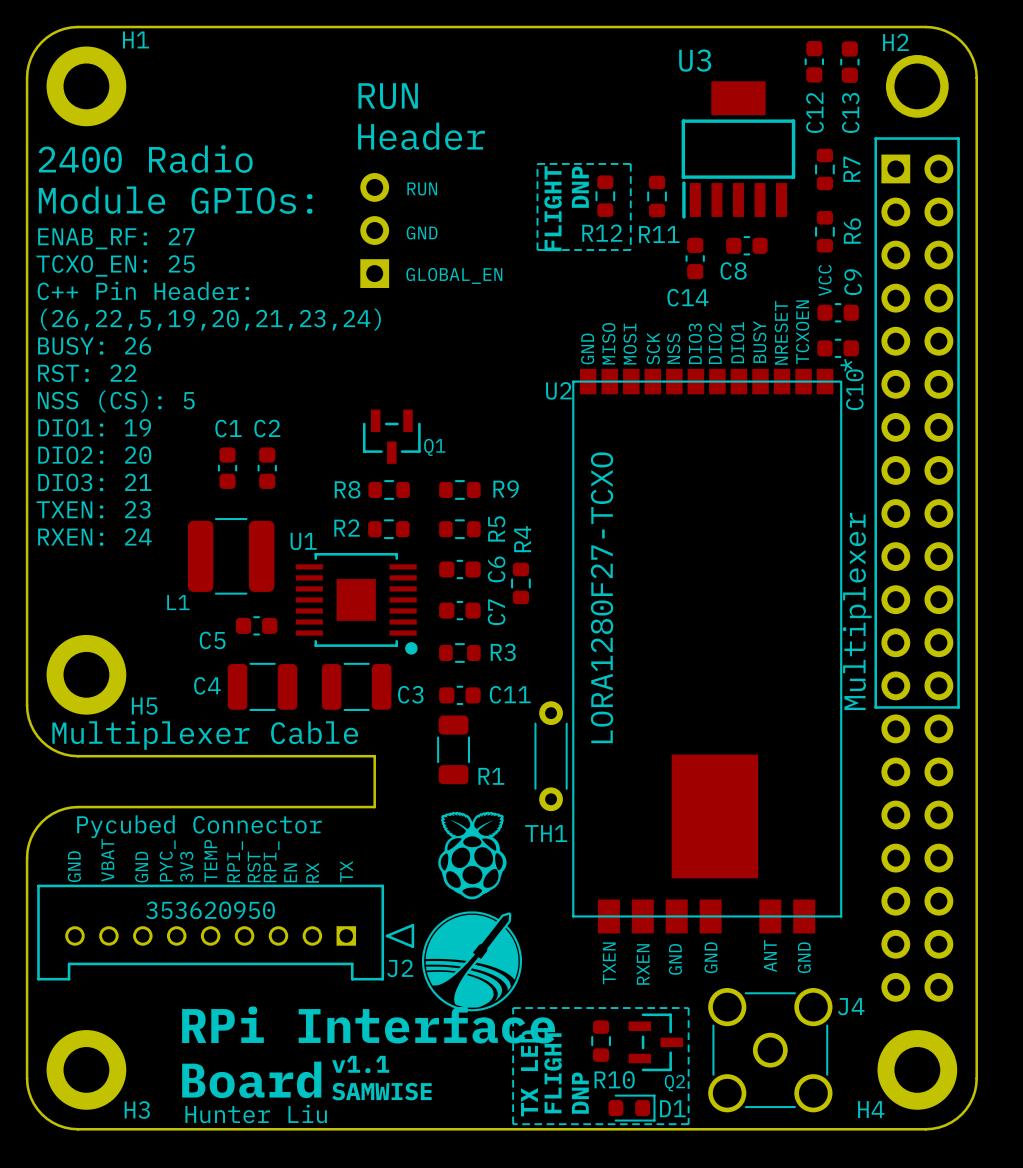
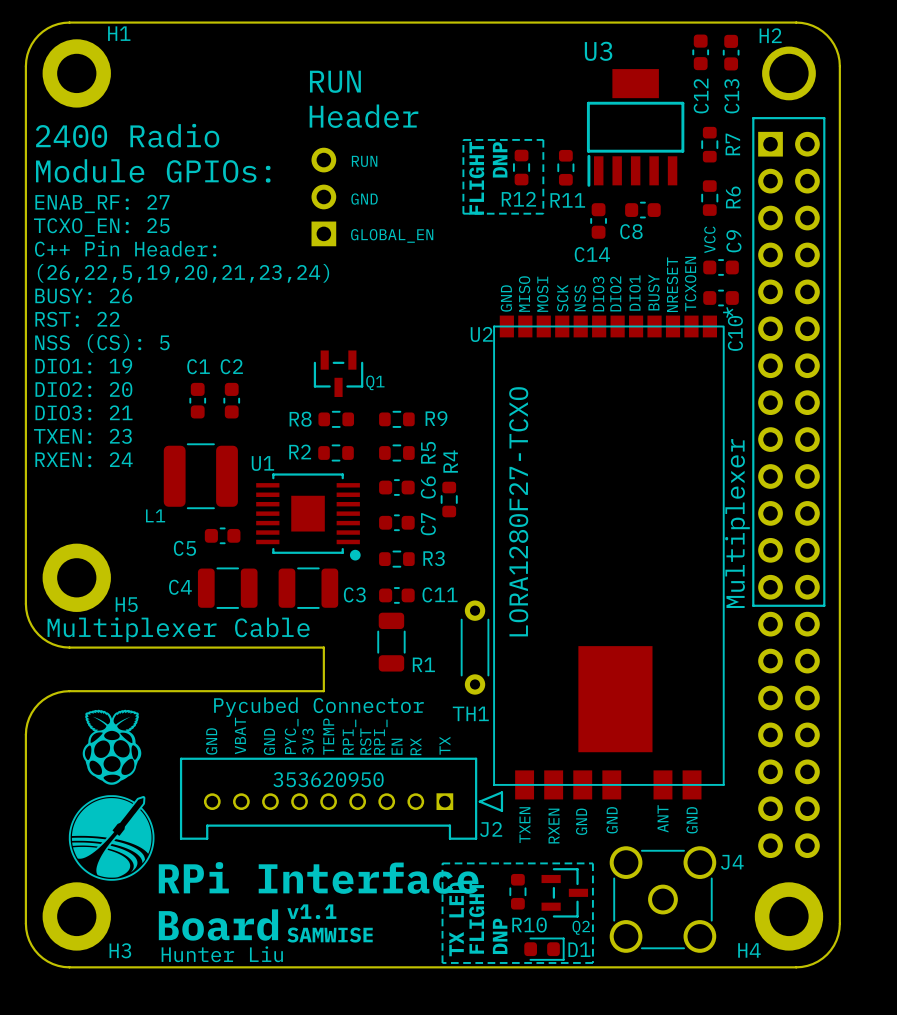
text position: Pycubed Connector (199, 826) -> Pycubed Connector (318, 707)
drawing position: (472, 855) -> (111, 747)
text position: VBAT (107, 860) -> VBAT (240, 735)
text position: PYC_ (167, 860) -> PYC_ (291, 736)
text: none -> RPI_ (349, 737)
text: none -> RPI_ (380, 737)
text position: TEMP (210, 861) -> TEMP (328, 736)
text: RPI_ (235, 861) -> GND (211, 741)
text: RPI_ (271, 861) -> none
text: GND (74, 866) -> none
text position: 3V3 (186, 866) -> 3V3 (307, 741)
text position: RST (254, 866) -> RST (365, 741)
text: none -> GND (269, 741)
text: GND (141, 867) -> none
text position: TX (346, 871) -> TX (444, 745)
text position: EN (290, 872) -> EN (397, 746)
text position: RX (312, 872) -> RX (415, 746)
J2 position: (225, 932) -> (341, 798)
drawing position: (471, 961) -> (111, 837)

